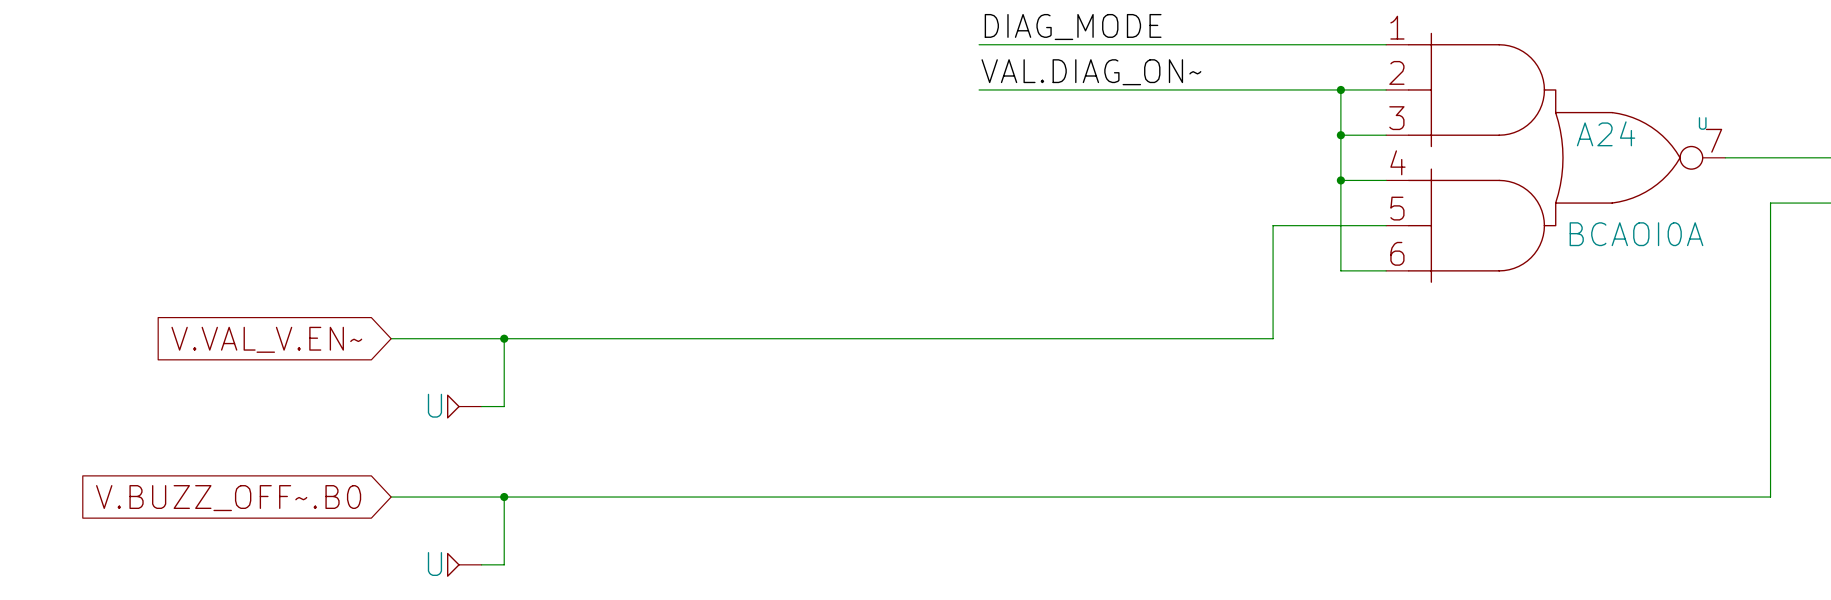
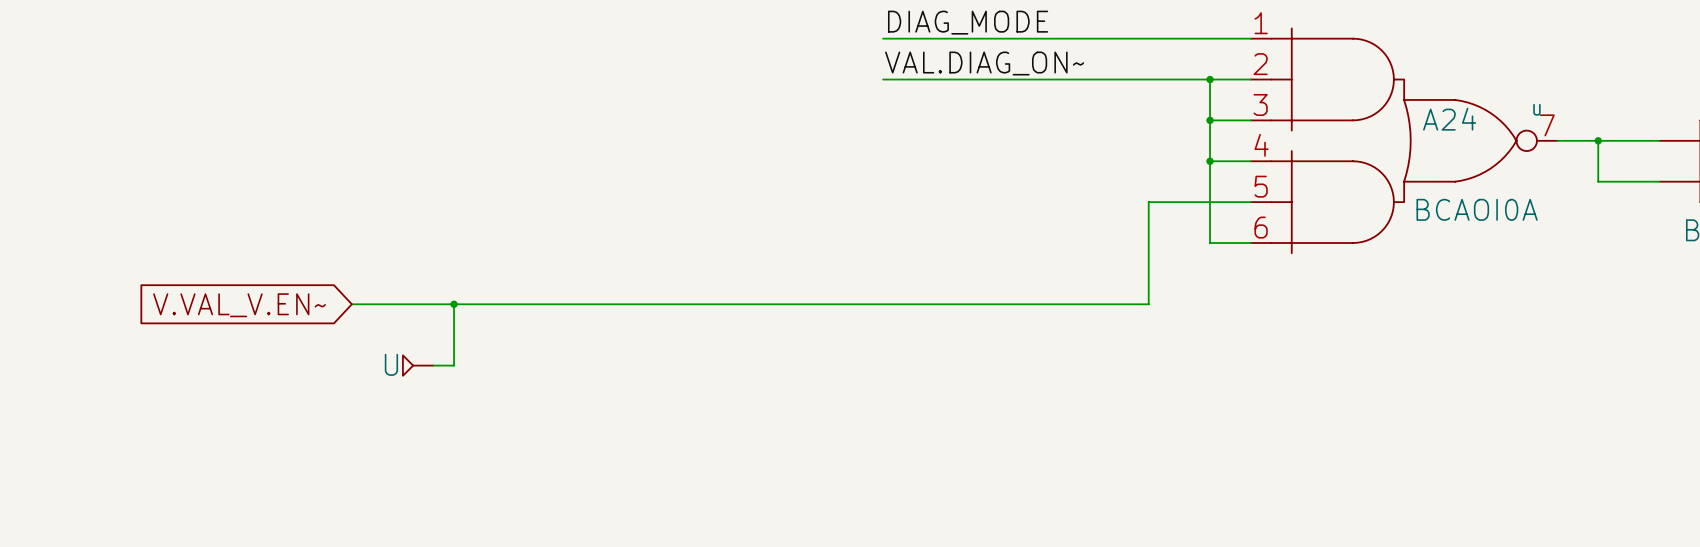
junction: none -> (1598, 140)
wire: (1770, 203) (1770, 497) (391, 497) -> (1598, 181) (1598, 140)
wire: (504, 497) (504, 564) (481, 564) -> none
junction: (504, 497) -> none
global label: V.BUZZ_OFF~.B0 (228, 498) -> none
U: (464, 564) -> none

